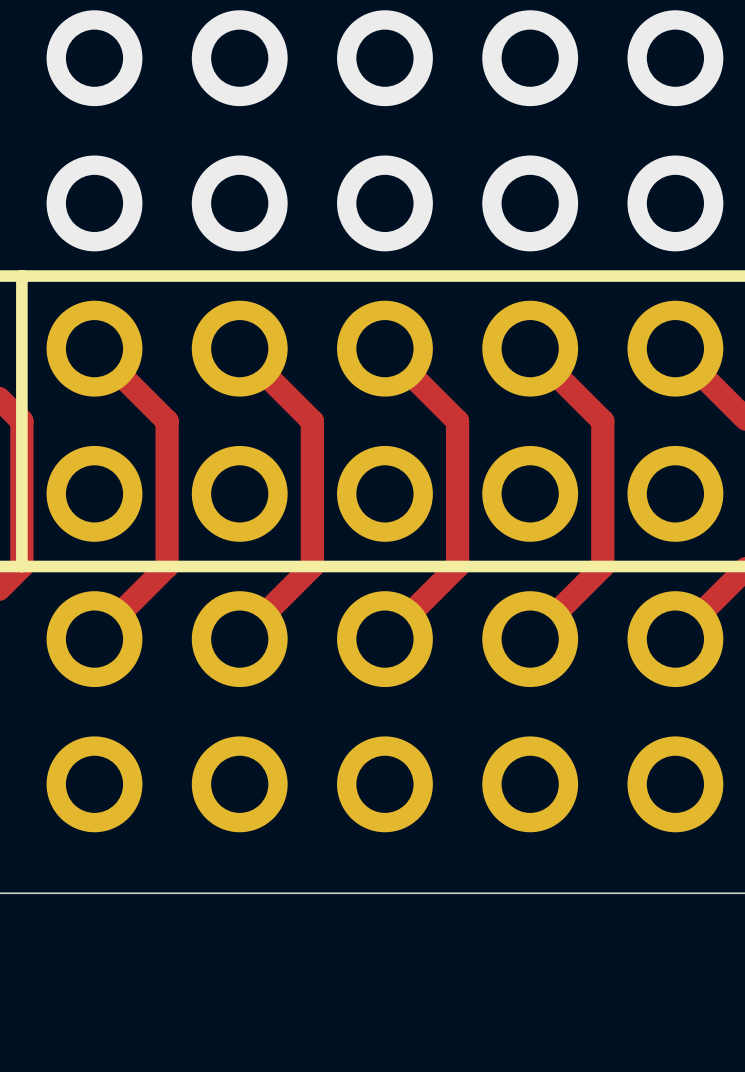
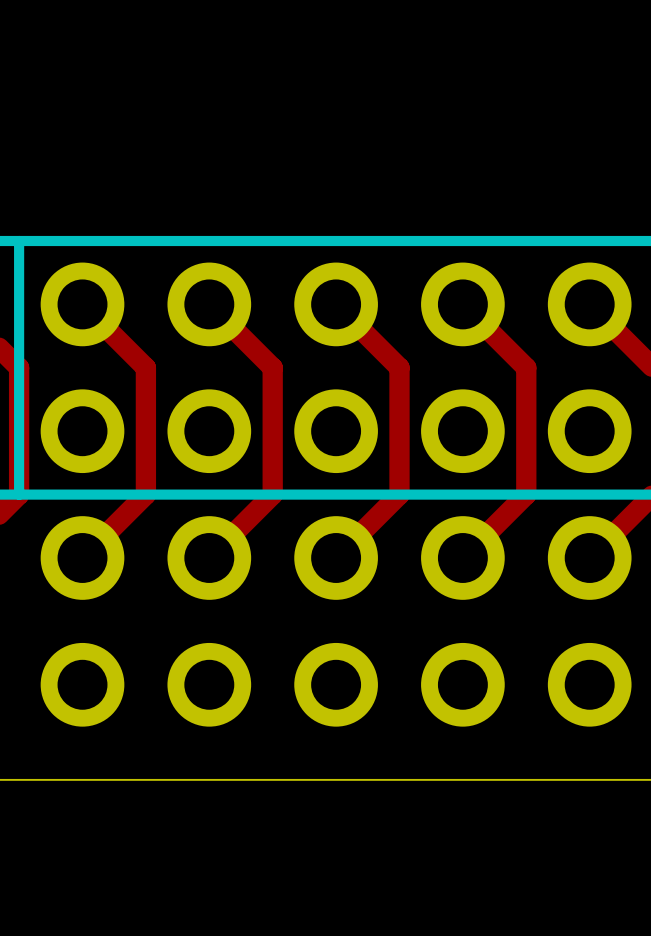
via: (94, 58) -> none
via: (239, 58) -> none
via: (384, 58) -> none
via: (530, 58) -> none
via: (675, 58) -> none
via: (94, 203) -> none
via: (239, 203) -> none
via: (384, 203) -> none
via: (530, 203) -> none
via: (675, 203) -> none

